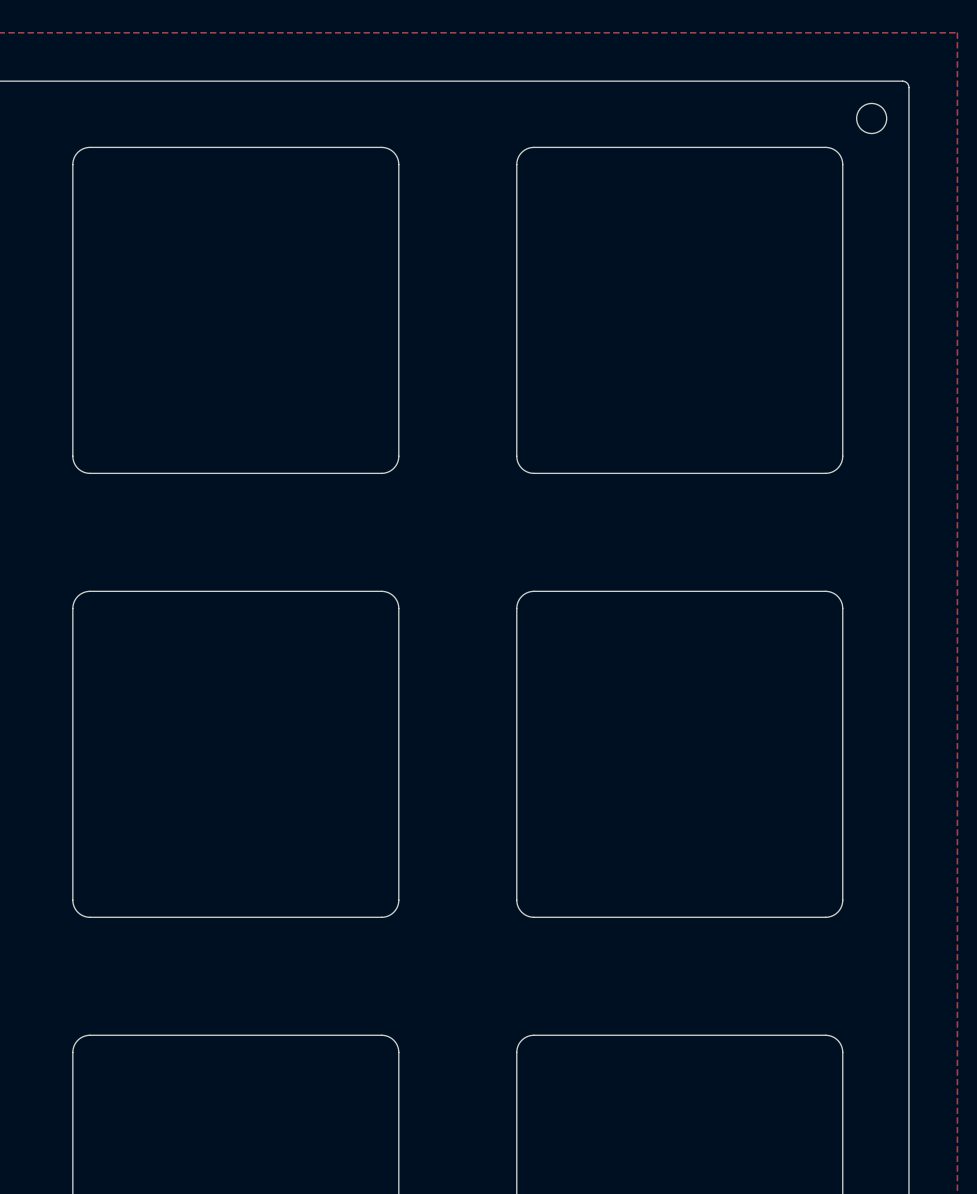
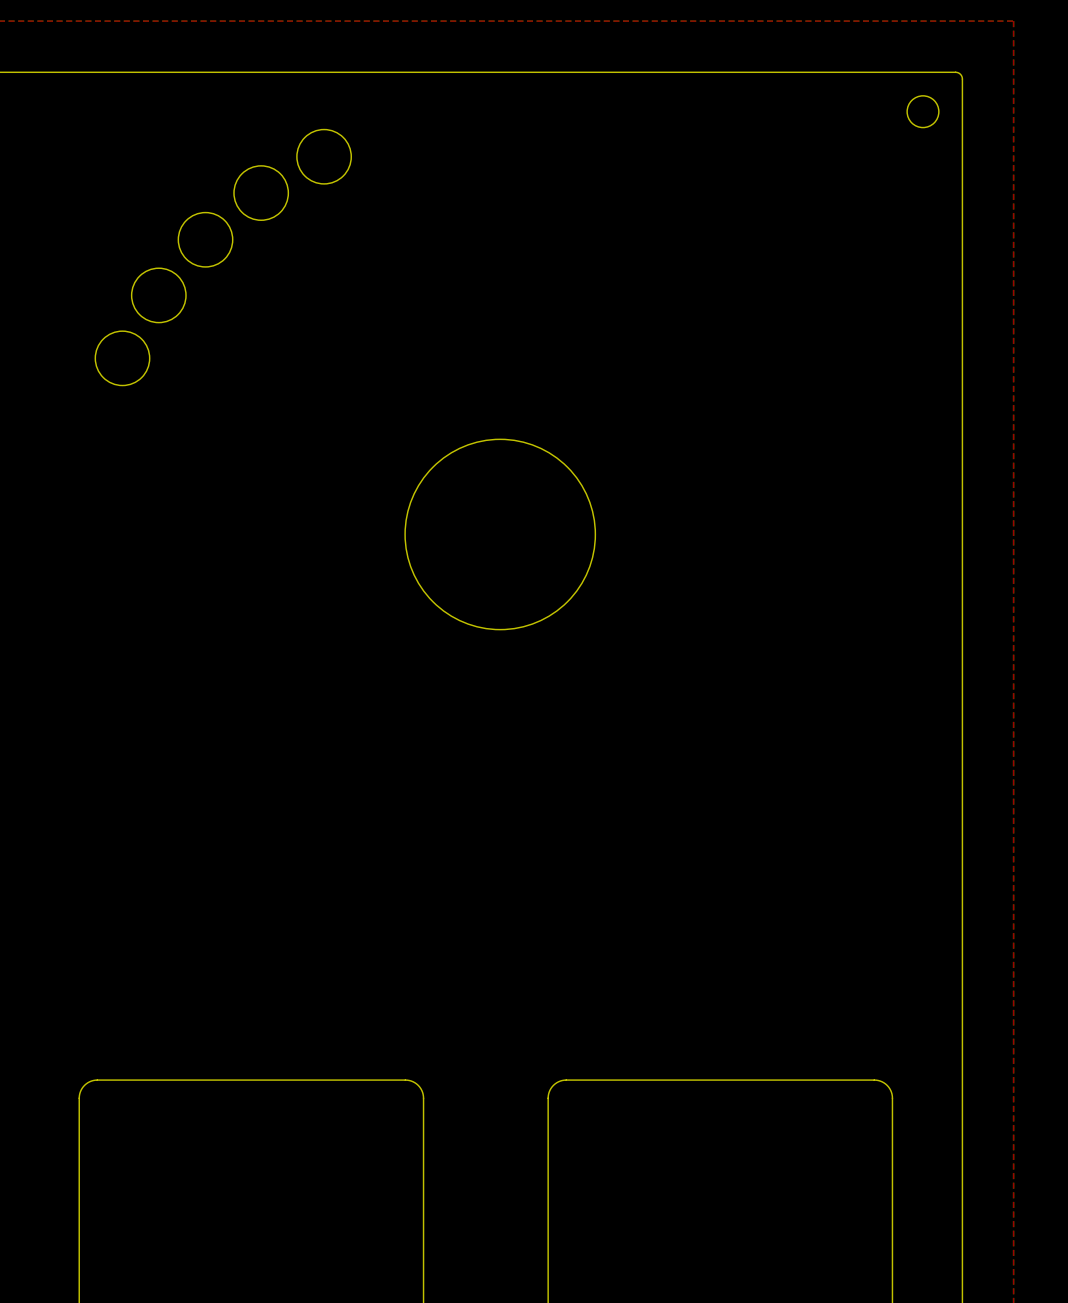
round board edge: none -> [296, 129, 352, 185]
board edge: (89, 147) (381, 147) (393, 152) (398, 164) (398, 456) (393, 468) (381, 473) (89, 473) (77, 468) (72, 456) (72, 164) (77, 152) (89, 147) -> none
board edge: (533, 147) (825, 147) (837, 152) (842, 164) (842, 456) (837, 468) (825, 473) (533, 473) (521, 468) (516, 456) (516, 164) (521, 152) (533, 147) -> none
round board edge: none -> [233, 165, 289, 221]
round board edge: none -> [177, 212, 234, 268]
round board edge: none -> [131, 267, 187, 324]
round board edge: none -> [94, 330, 151, 386]
round board edge: none -> [404, 438, 596, 631]
board edge: (89, 591) (381, 591) (393, 596) (398, 608) (398, 900) (393, 912) (381, 917) (89, 917) (77, 912) (72, 900) (72, 608) (77, 596) (89, 591) -> none
board edge: (533, 591) (825, 591) (837, 596) (842, 608) (842, 900) (837, 912) (825, 917) (533, 917) (521, 912) (516, 900) (516, 608) (521, 596) (533, 591) -> none

